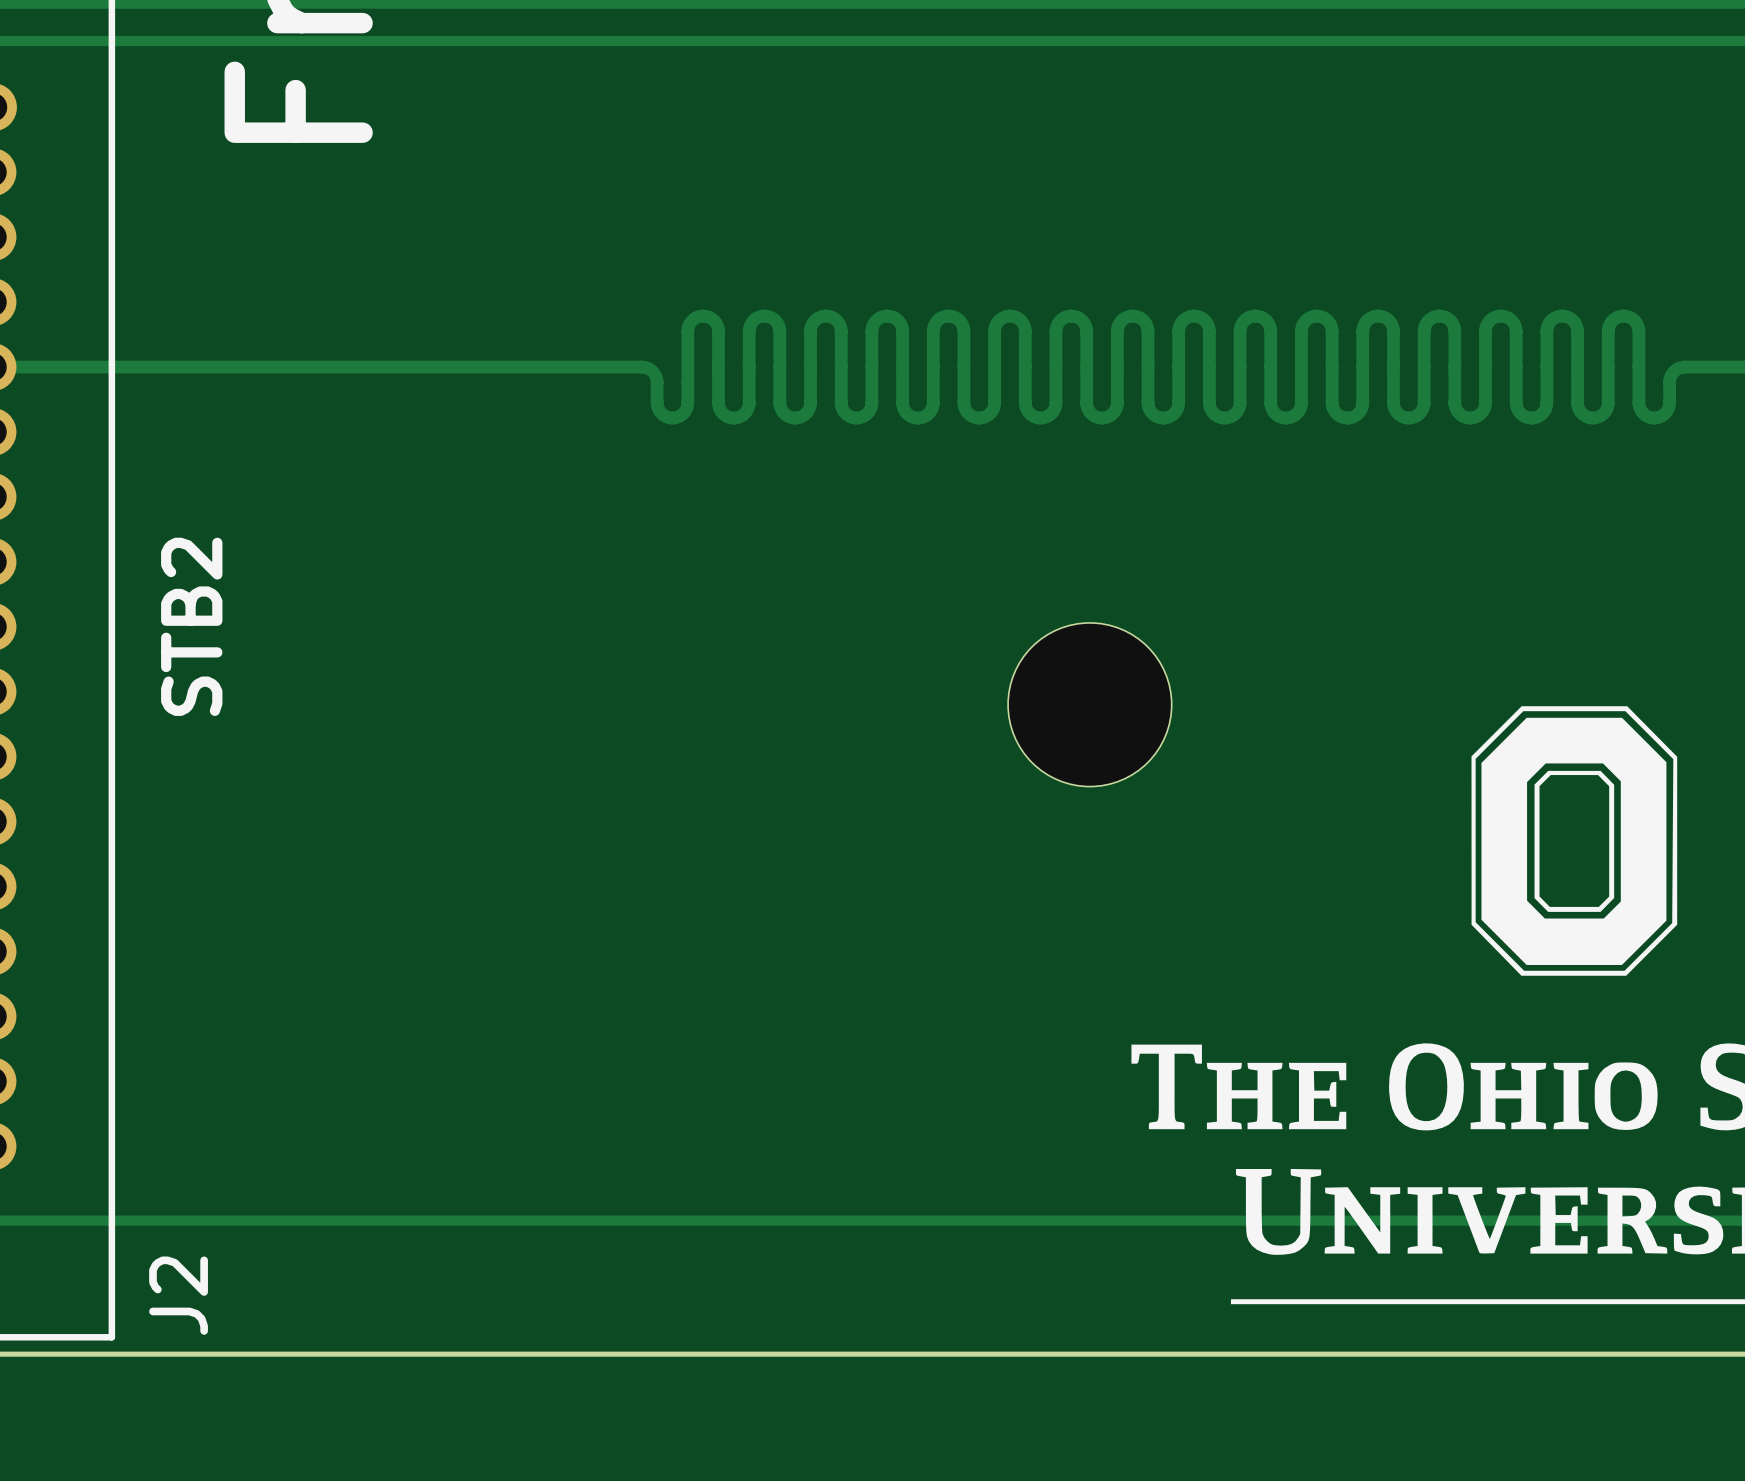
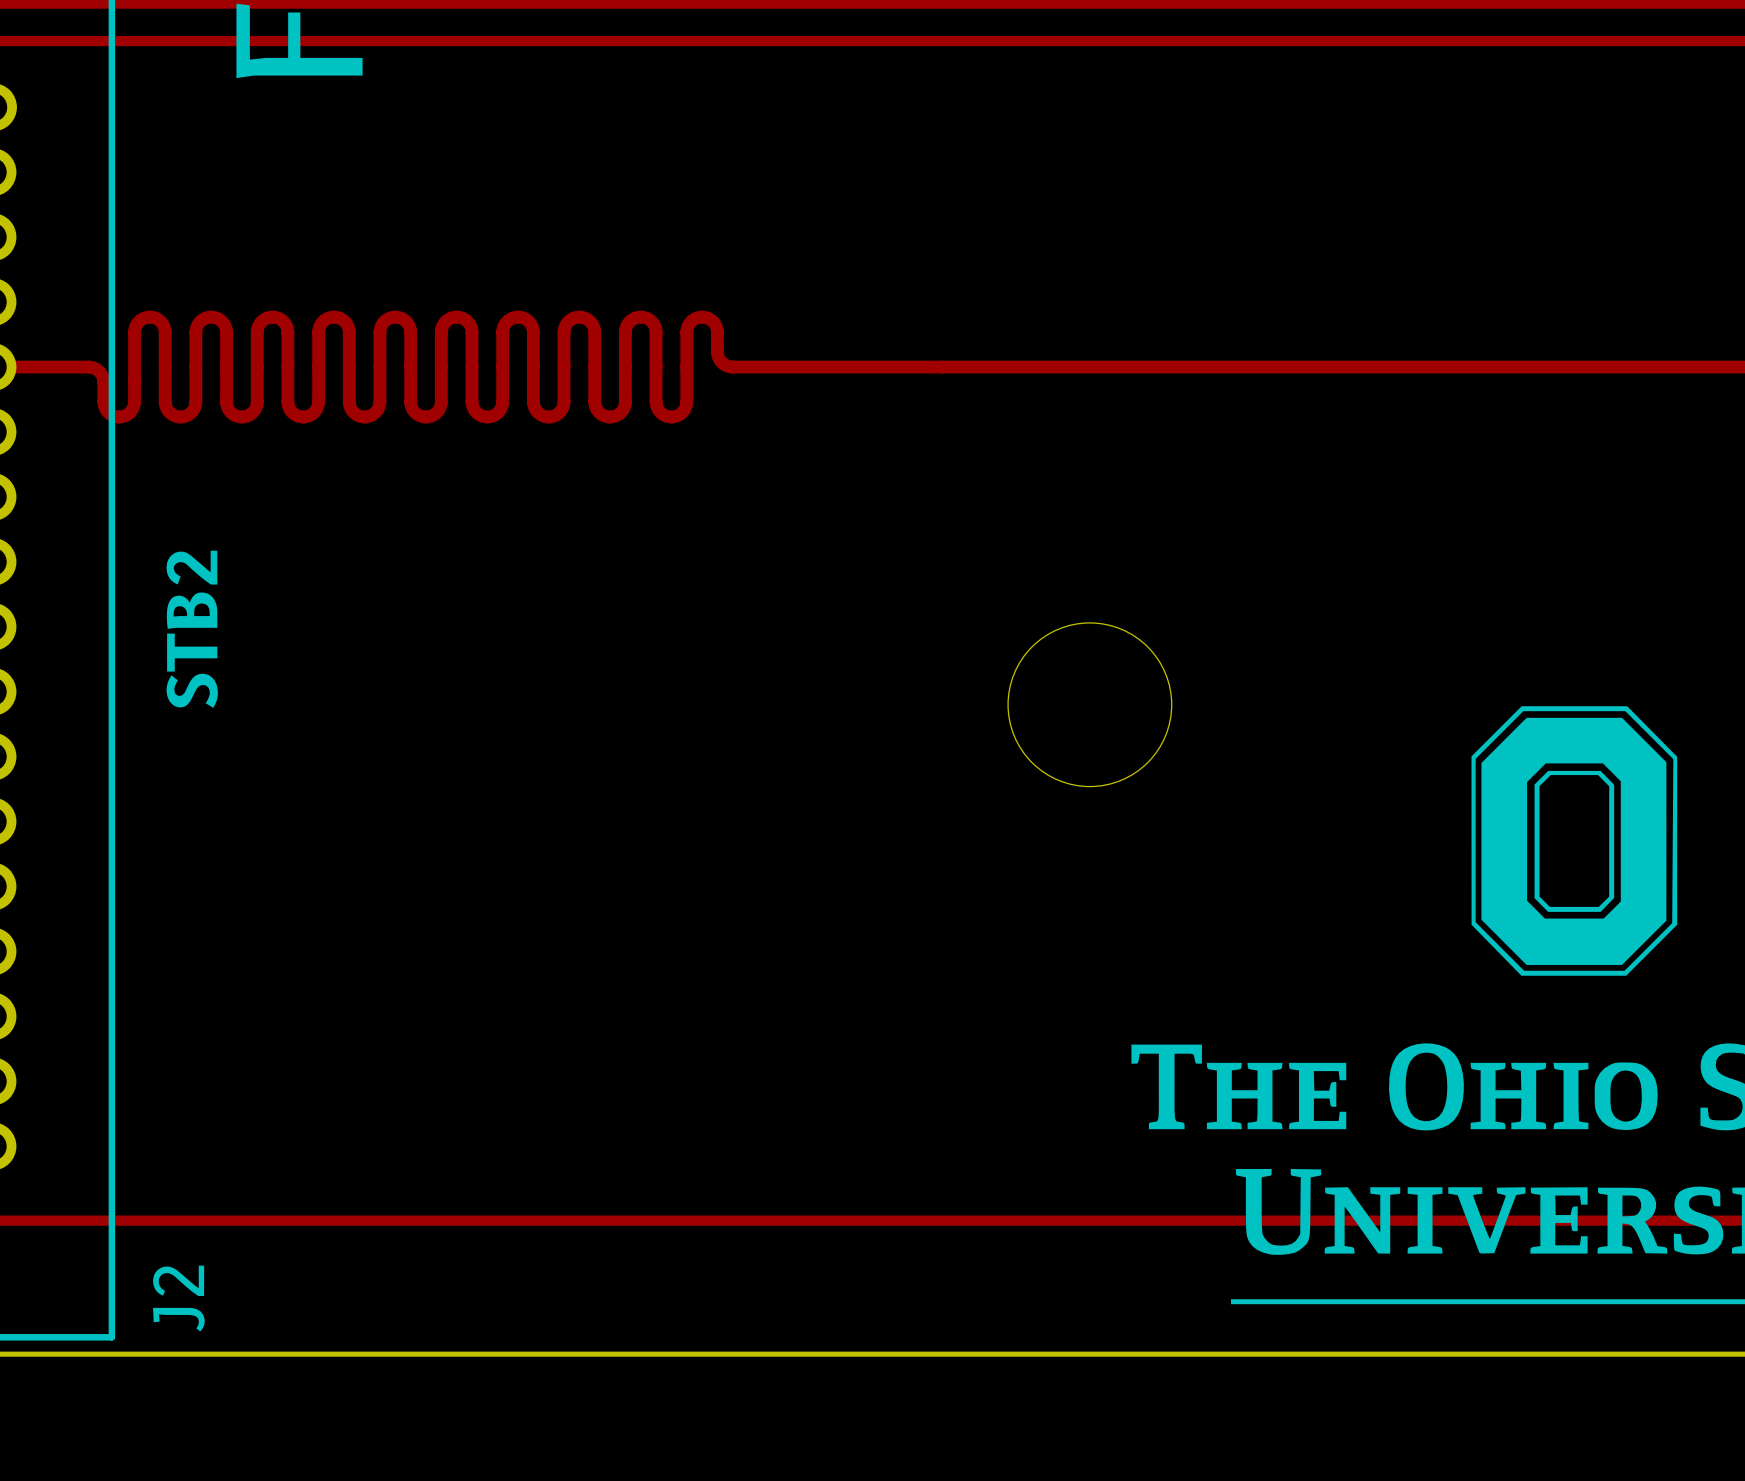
track: (88, 367) (643, 367) (651, 370) (655, 376) (659, 410) (664, 416) (672, 418) (681, 414) (687, 404) (688, 327) (693, 319) (703, 316) (713, 320) (718, 329) (719, 406) (724, 414) (733, 418) (743, 414) (748, 406) (749, 329) (753, 320) (764, 316) (775, 320) (779, 329) (780, 406) (785, 414) (795, 418) (804, 414) (810, 406) (810, 329) (815, 320) (825, 316) (835, 319) (840, 327) (841, 404) (845, 413) (856, 418) (865, 414) (871, 404) (872, 327) (877, 319) (887, 316) (898, 320) (902, 329) (903, 406) (908, 414) (917, 418) (927, 414) (932, 406) (933, 329) (937, 320) (946, 316) (956, 318) (963, 327) (964, 404) (968, 413) (977, 417) (986, 416) (994, 406) (994, 329) (999, 320) (1007, 316) (1017, 318) (1024, 327) (1025, 404) (1029, 413) (1038, 417) (1048, 416) (1055, 406) (1056, 329) (1060, 320) (1069, 316) (1078, 318) (1086, 327) (1086, 404) (1091, 413) (1099, 417) (1109, 416) (1116, 406) (1117, 329) (1121, 320) (1130, 316) (1140, 318) (1147, 327) (1148, 404) (1152, 413) (1161, 417) (1171, 416) (1178, 406) (1178, 329) (1183, 320) (1192, 316) (1201, 318) (1208, 327) (1209, 404) (1213, 413) (1222, 417) (1232, 416) (1239, 406) (1240, 329) (1244, 320) (1253, 316) (1263, 318) (1270, 327) (1270, 404) (1275, 413) (1284, 417) (1293, 416) (1300, 406) (1301, 329) (1305, 320) (1314, 316) (1324, 318) (1331, 327) (1332, 404) (1336, 413) (1345, 417) (1355, 416) (1362, 406) (1362, 329) (1367, 320) (1376, 316) (1385, 318) (1392, 327) (1393, 404) (1397, 413) (1406, 417) (1416, 416) (1423, 406) (1424, 329) (1428, 320) (1437, 316) (1447, 318) (1454, 327) (1454, 404) (1458, 412) (1466, 417) (1477, 416) (1484, 406) (1485, 329) (1490, 320) (1496, 316) (1508, 318) (1515, 327) (1516, 404) (1520, 413) (1527, 417) (1539, 416) (1546, 406) (1547, 329) (1550, 322) (1558, 316) (1569, 318) (1577, 327) (1577, 404) (1580, 412) (1587, 416) (1598, 416) (1605, 412) (1607, 406) (1608, 329) (1611, 322) (1615, 318) (1623, 316) (1629, 317) (1635, 322) (1638, 327) (1639, 404) (1644, 414) (1656, 417) (1666, 412) (1669, 404) (1670, 376) (1677, 369) (1684, 367) -> (88, 367) (96, 369) (101, 374) (104, 407) (109, 413) (119, 417) (130, 412) (134, 403) (135, 328) (140, 320) (149, 317) (159, 320) (164, 328) (165, 403) (171, 413) (180, 417) (189, 413) (195, 405) (195, 330) (200, 321) (211, 317) (220, 320) (226, 330) (227, 405) (232, 413) (241, 417) (251, 413) (257, 403) (257, 328) (263, 320) (272, 317) (283, 321) (287, 330) (288, 405) (293, 413) (303, 417) (312, 413) (318, 405) (318, 330) (324, 320) (333, 317) (343, 320) (349, 330) (349, 405) (355, 413) (364, 417) (373, 413) (379, 405) (380, 330) (385, 320) (395, 317) (404, 320) (410, 330) (411, 405) (416, 413) (425, 417) (435, 413) (441, 403) (441, 328) (447, 320) (456, 317) (465, 320) (471, 328) (472, 403) (477, 413) (487, 417) (496, 413) (502, 405) (502, 330) (508, 320) (518, 317) (528, 321) (533, 330) (533, 405) (539, 413) (548, 417) (559, 412) (563, 403) (564, 328) (570, 320) (579, 317) (590, 321) (594, 330) (595, 405) (600, 413) (610, 417) (619, 413) (624, 405) (625, 330) (631, 320) (640, 317) (651, 321) (655, 330) (656, 405) (662, 413) (671, 417) (682, 412) (686, 403) (687, 328) (692, 320) (702, 317) (709, 319) (716, 326) (719, 359) (725, 365) (732, 367) (1684, 367)

